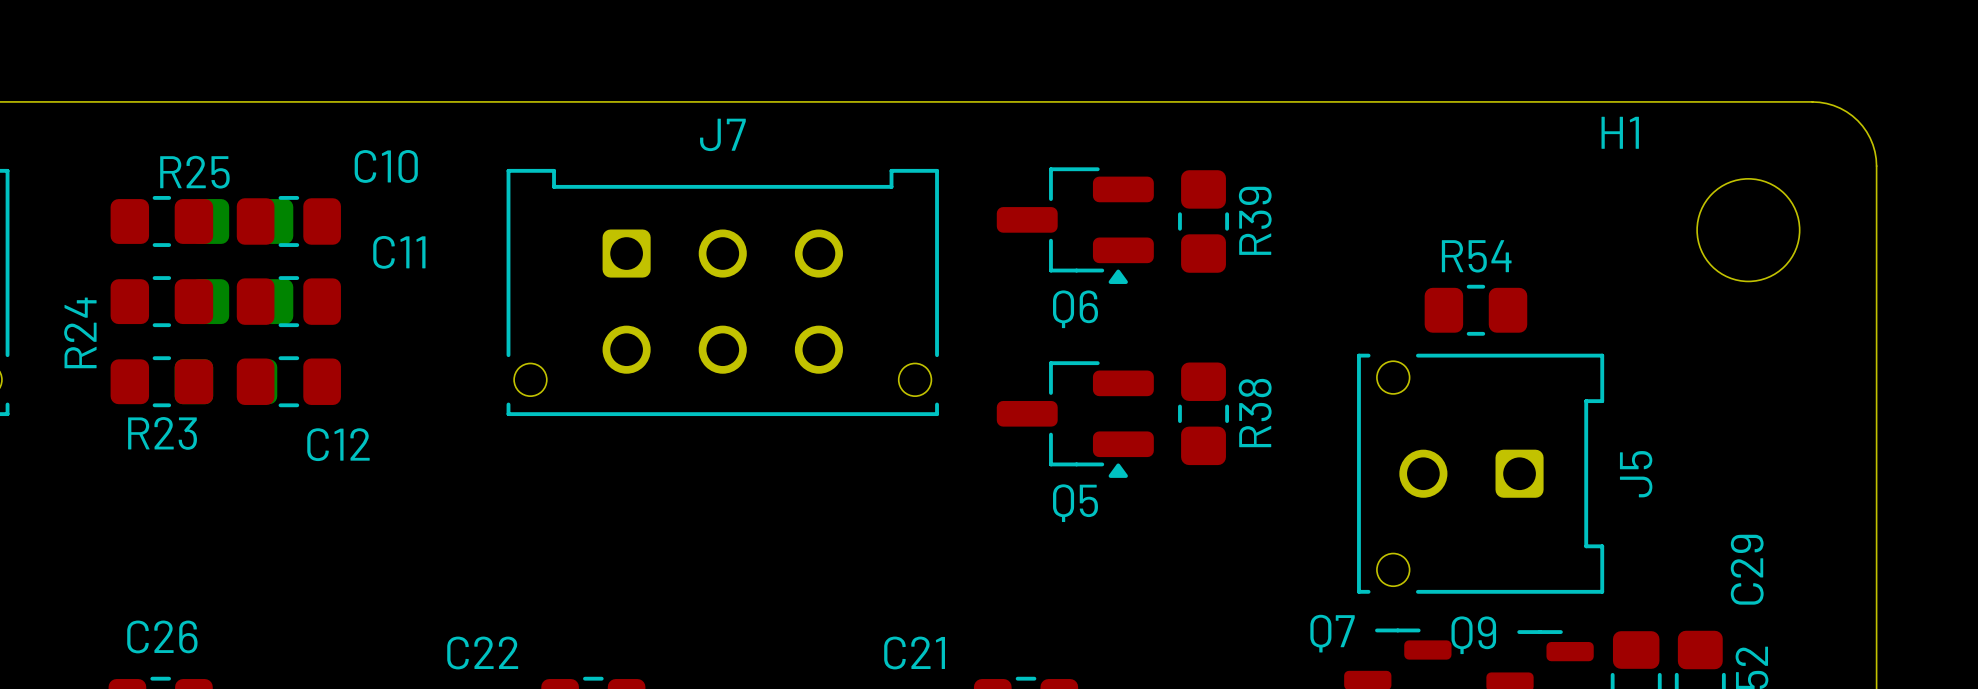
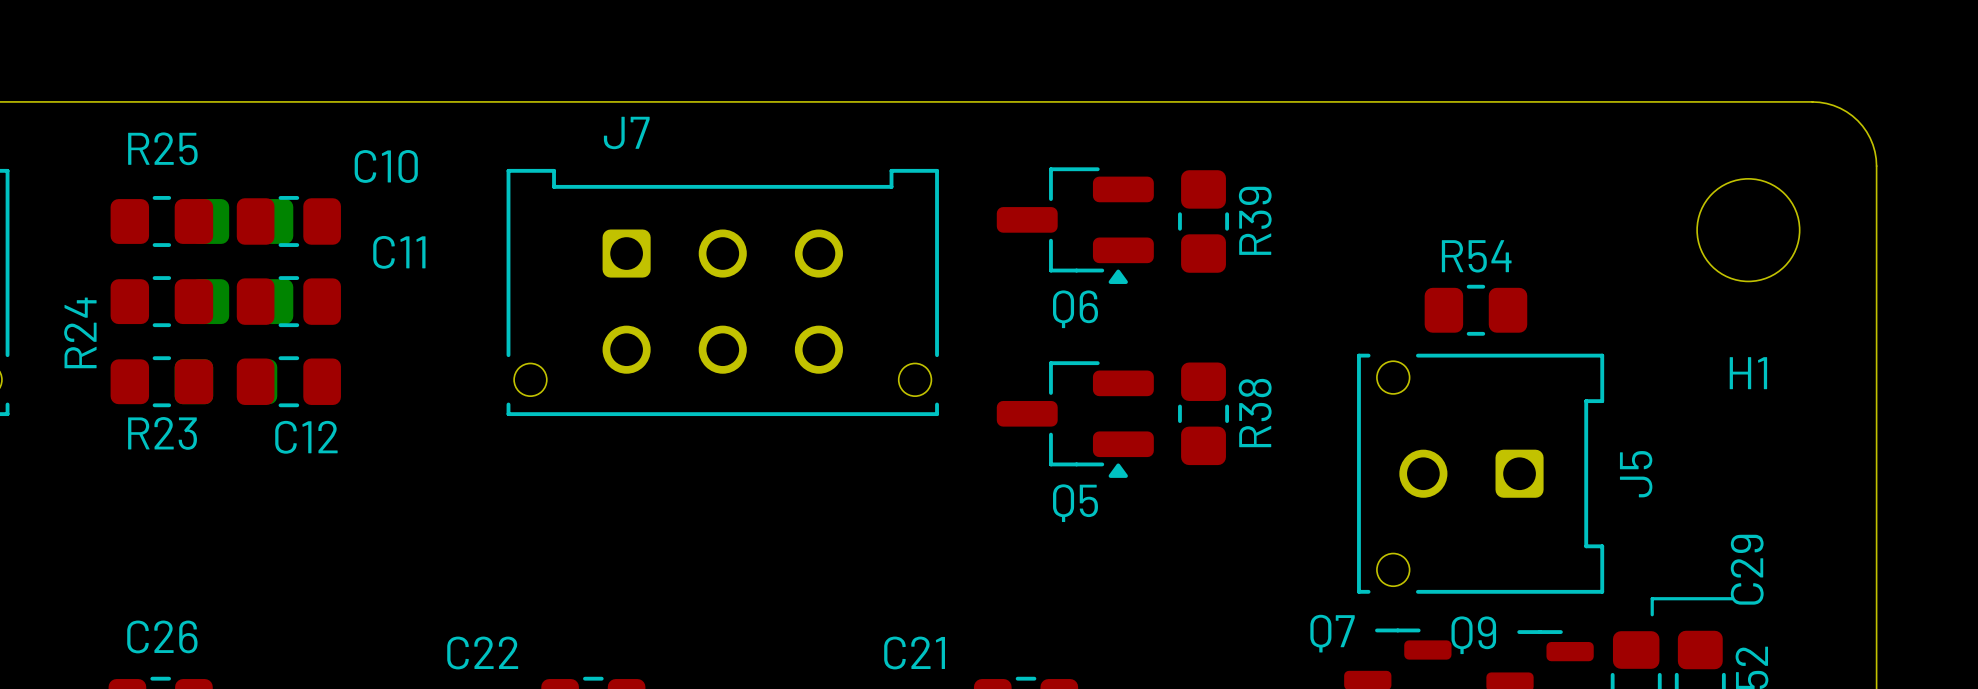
H1 name position: H1 (1620, 132) -> H1 (1748, 373)
J7 name position: J7 (722, 134) -> J7 (626, 132)
R25 name position: R25 (194, 172) -> R25 (162, 148)
C12 name position: C12 (338, 444) -> C12 (306, 437)
line: none -> (1732, 598) (1652, 598) (1652, 614)

